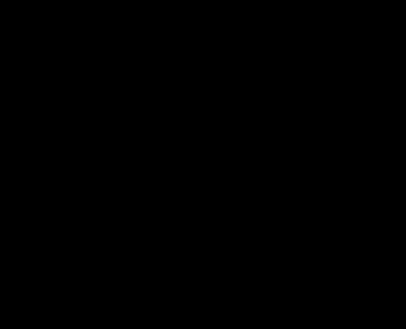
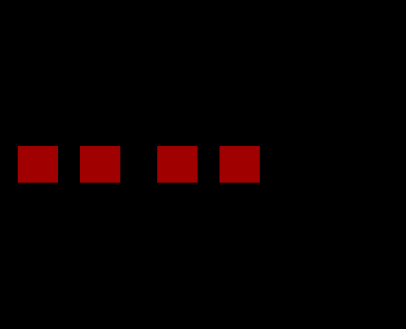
part: none -> (69, 164)
part: none -> (208, 164)

